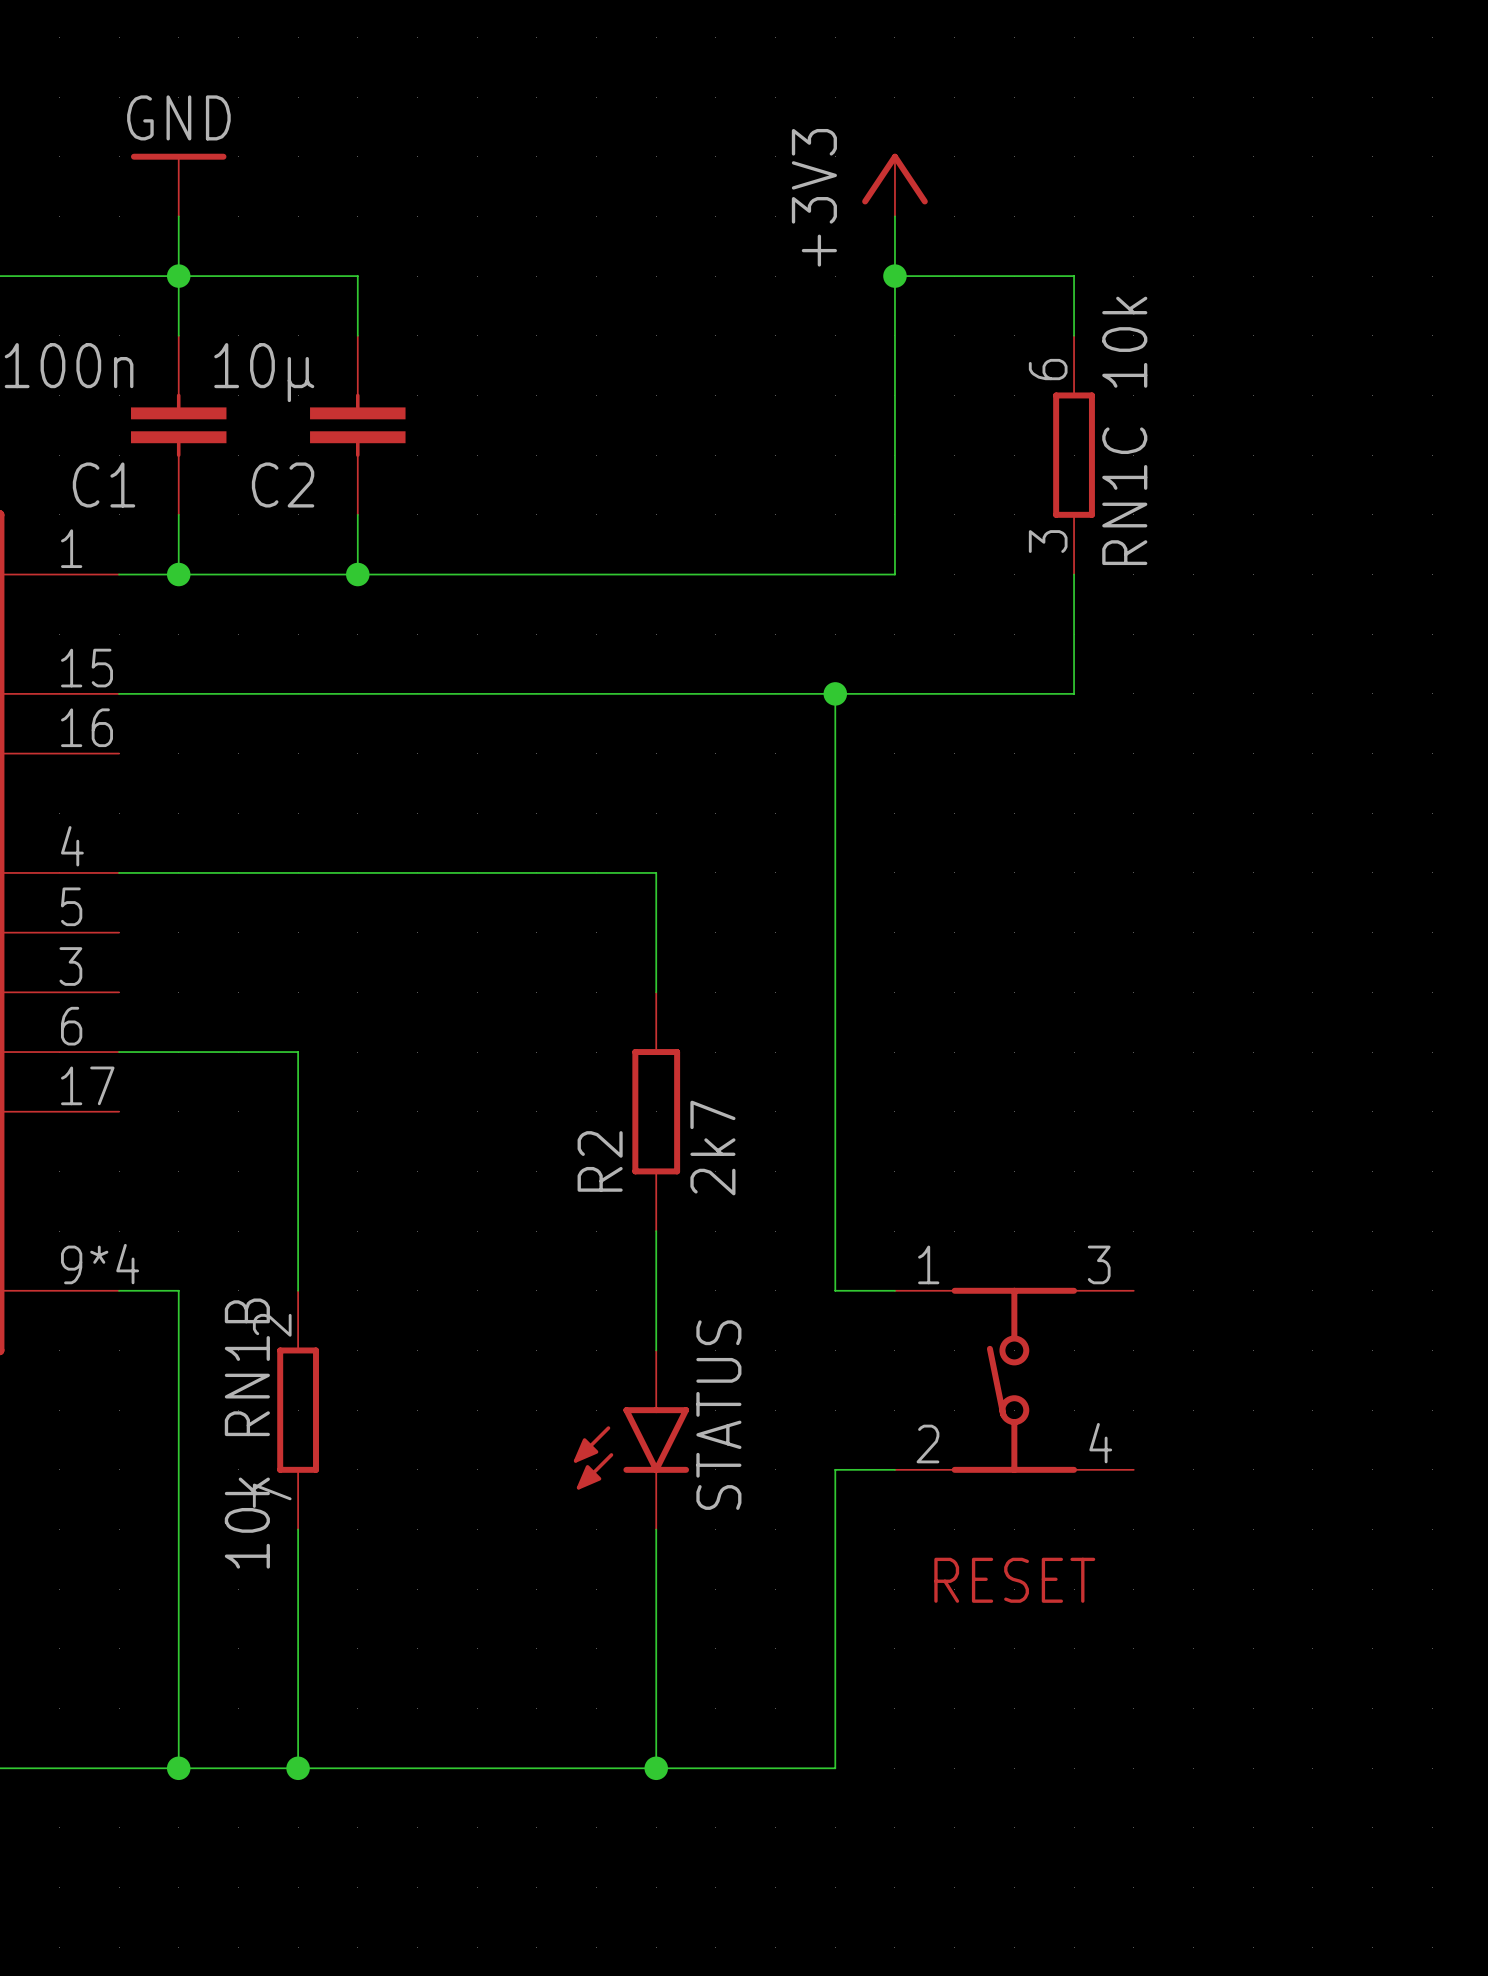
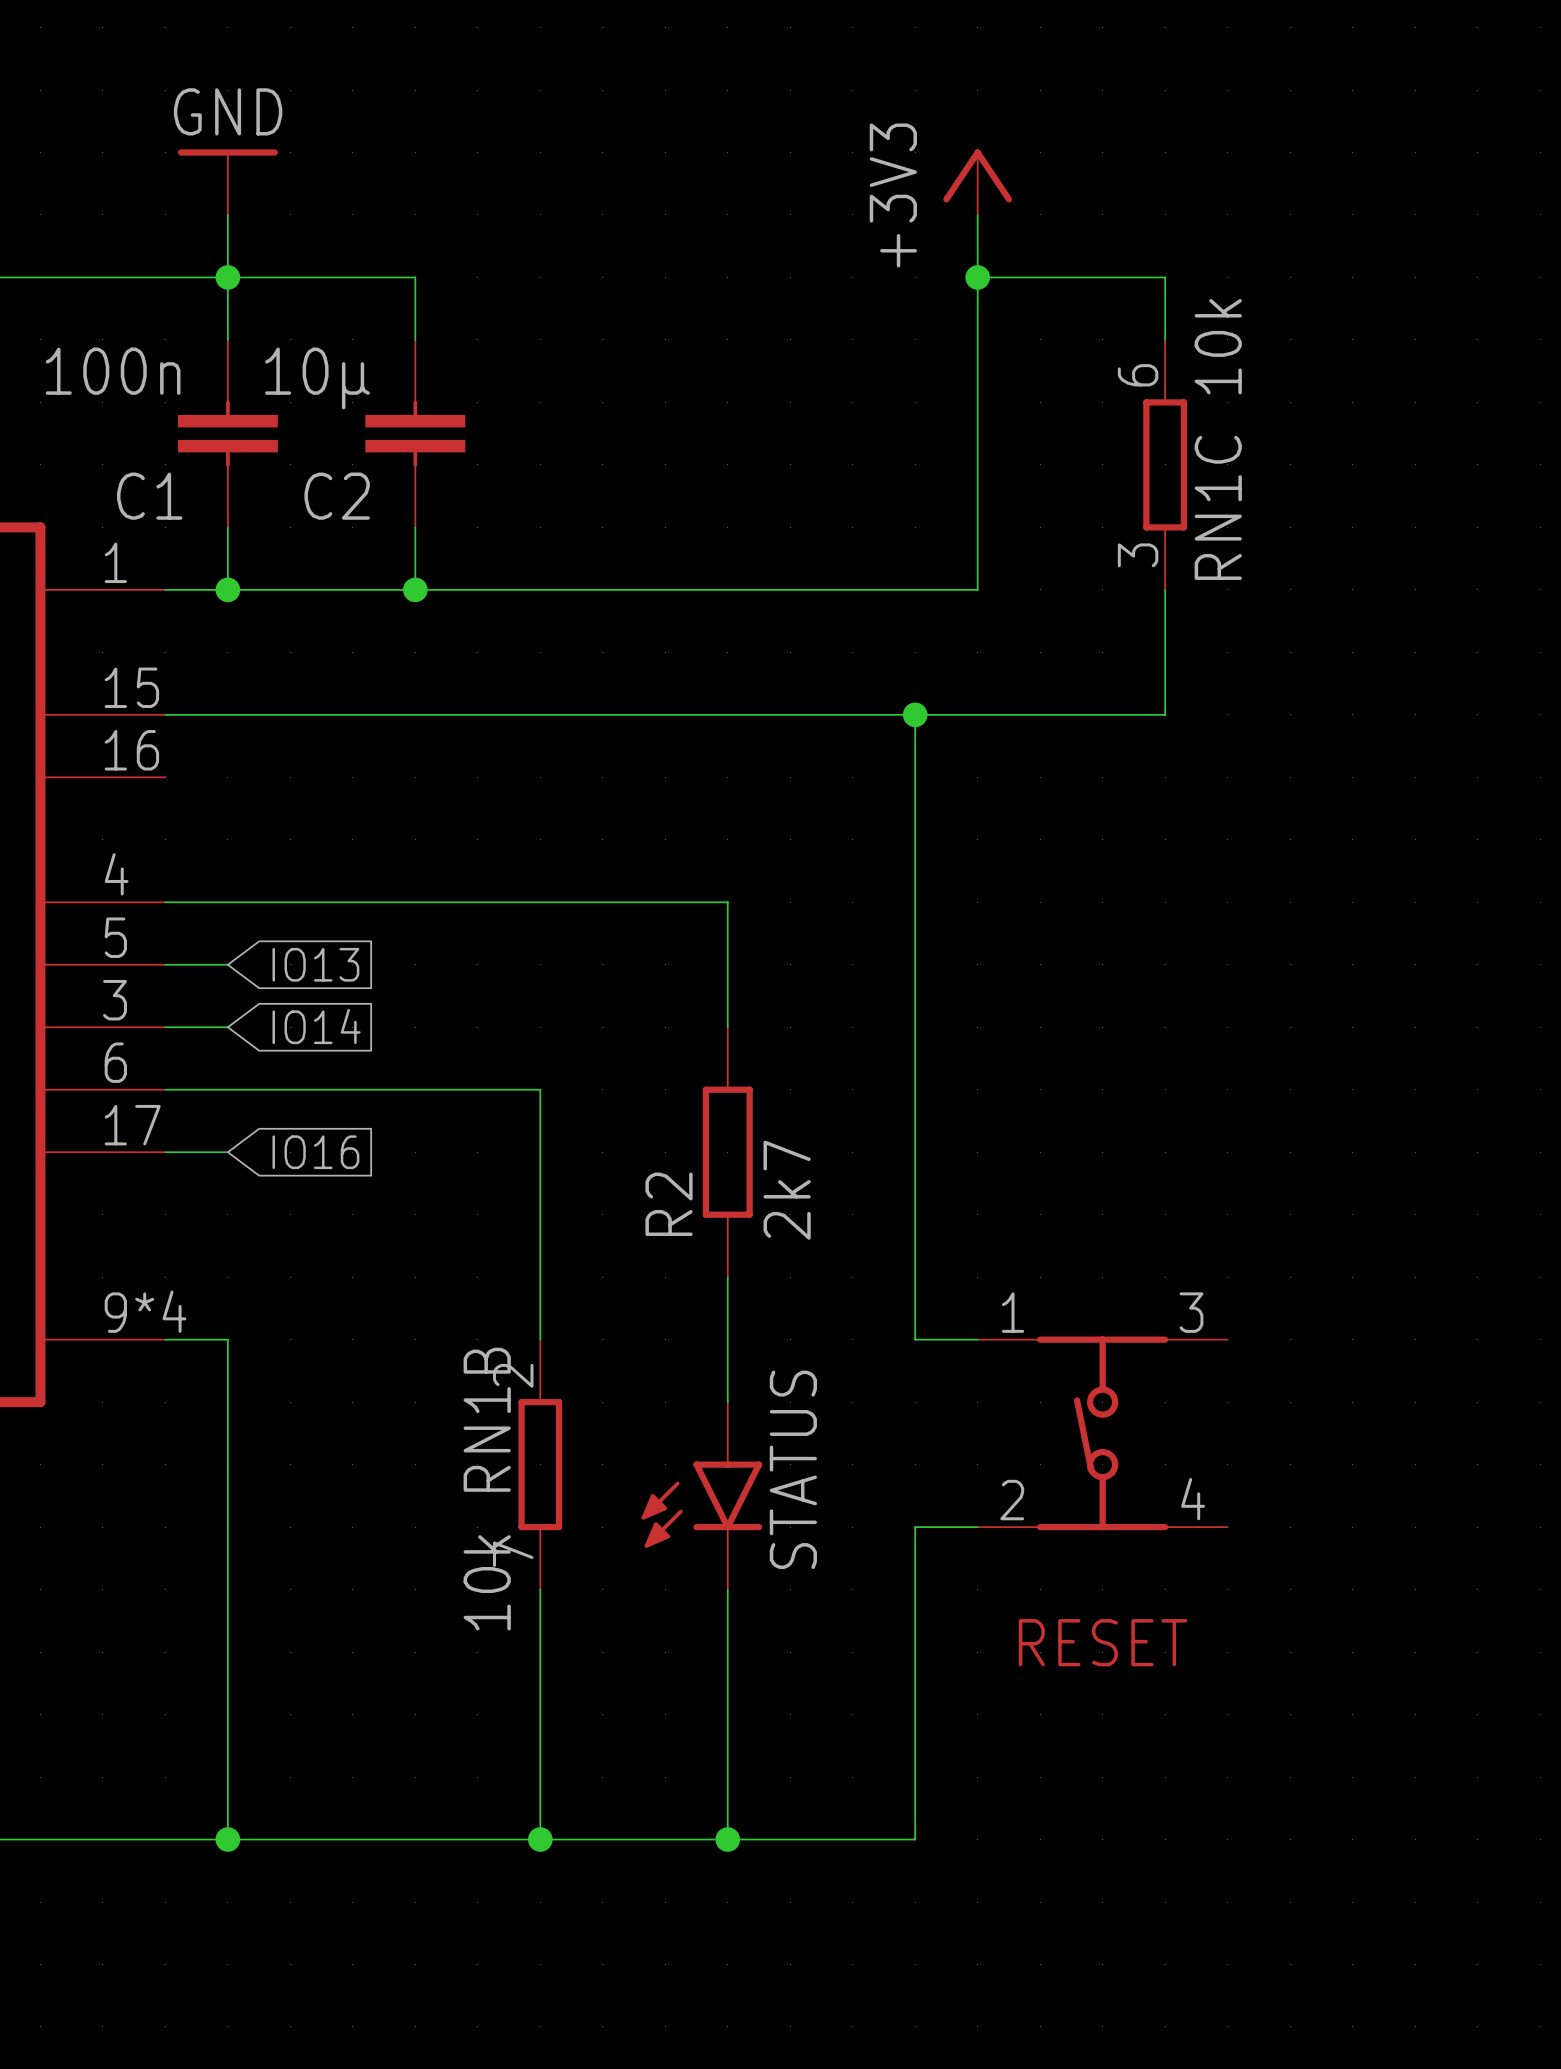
wire: none -> (165, 964) (227, 964)
global label: none -> IO13 (315, 964)
global label: none -> IO14 (316, 1026)
wire: none -> (165, 1027) (227, 1027)
wire: (298, 1052) (298, 1290) -> (352, 1089) (540, 1089) (540, 1339)
wire: none -> (165, 1152) (227, 1152)
global label: none -> IO16 (315, 1152)
RN1B position: (298, 1410) -> (540, 1464)
wire: (298, 1529) (298, 1768) -> (540, 1589) (540, 1839)
junction: (298, 1768) -> none
junction: none -> (540, 1839)

